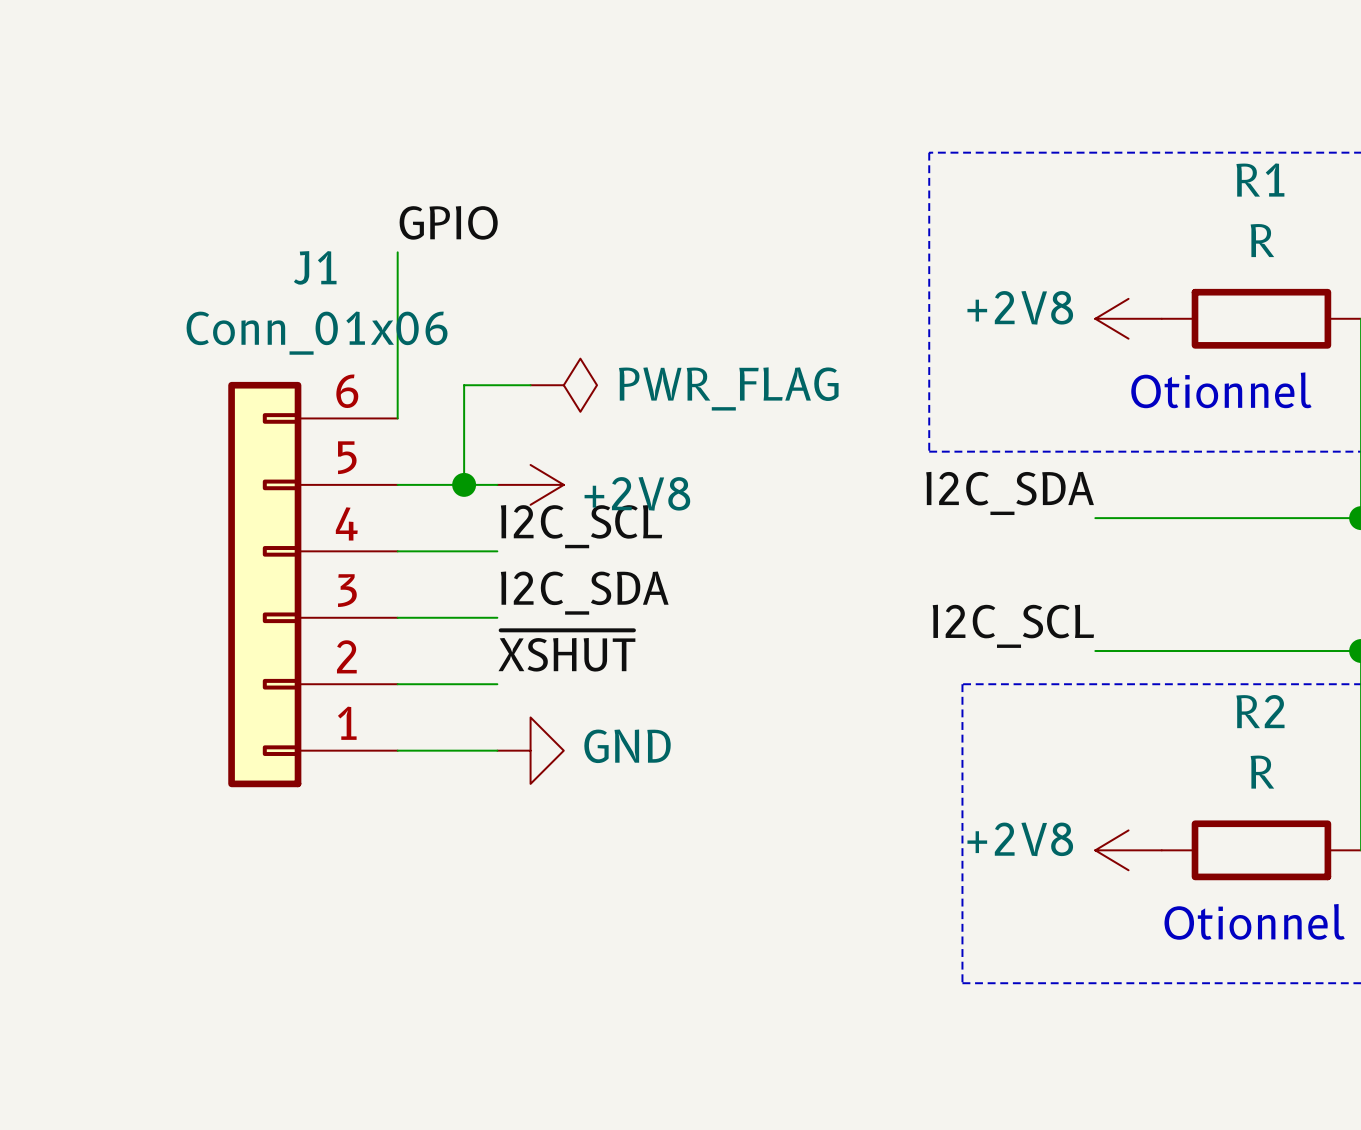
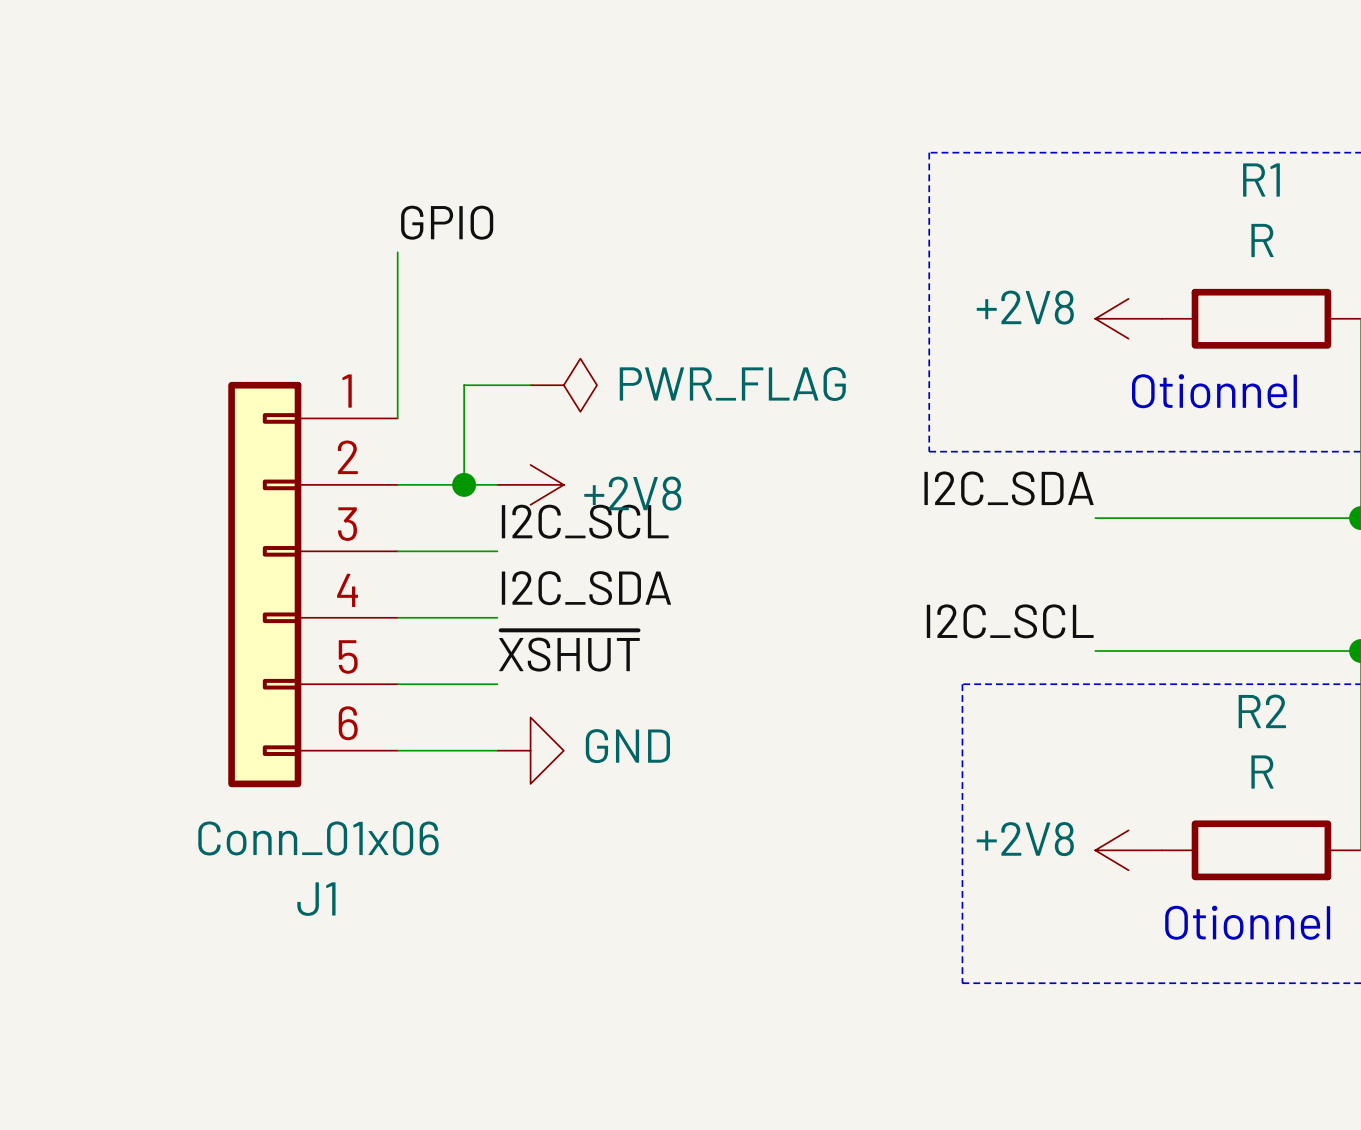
J1 flip: as is (264, 584) -> up-down (264, 584)

